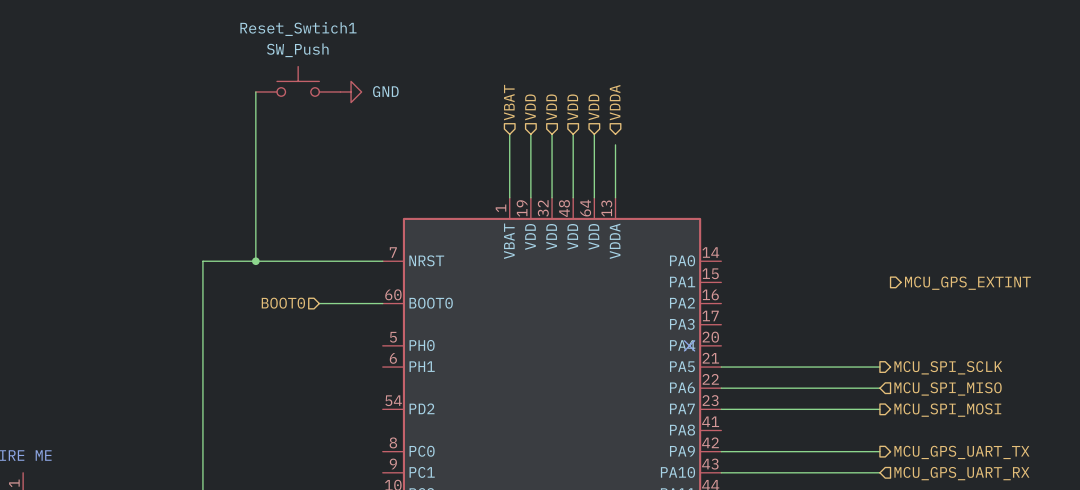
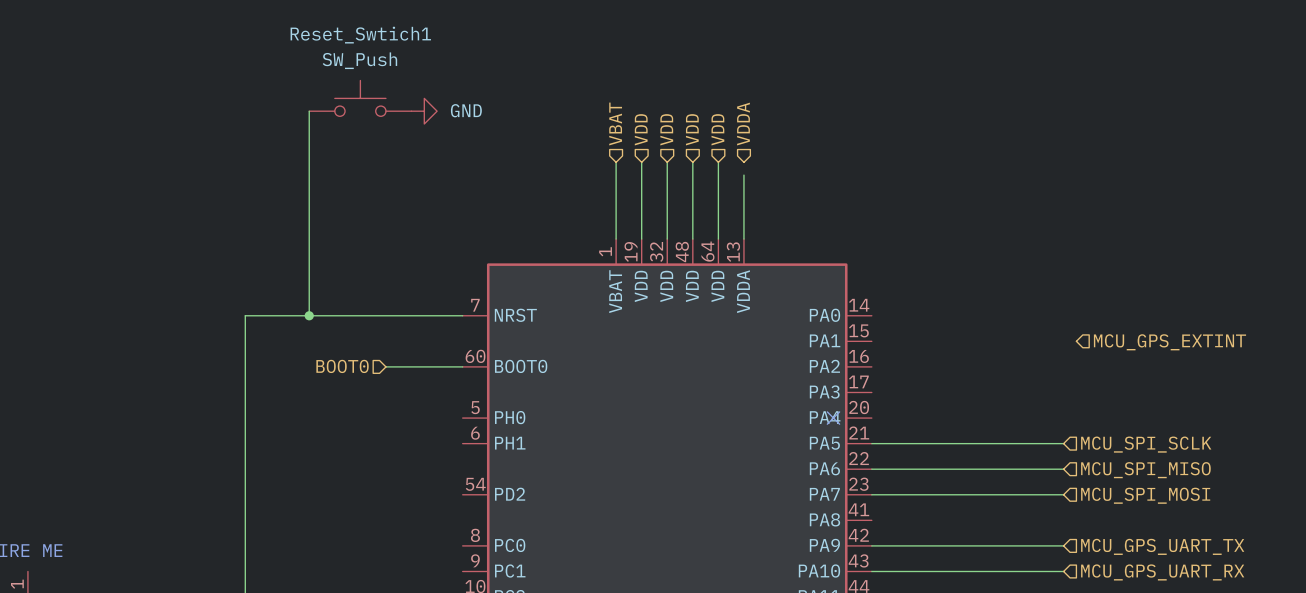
hierarchical label shape: output (967, 283) -> input (1169, 342)
hierarchical label shape: output (948, 367) -> input (1146, 444)
hierarchical label shape: output (947, 410) -> input (1145, 495)
hierarchical label shape: output (961, 452) -> input (1162, 546)

